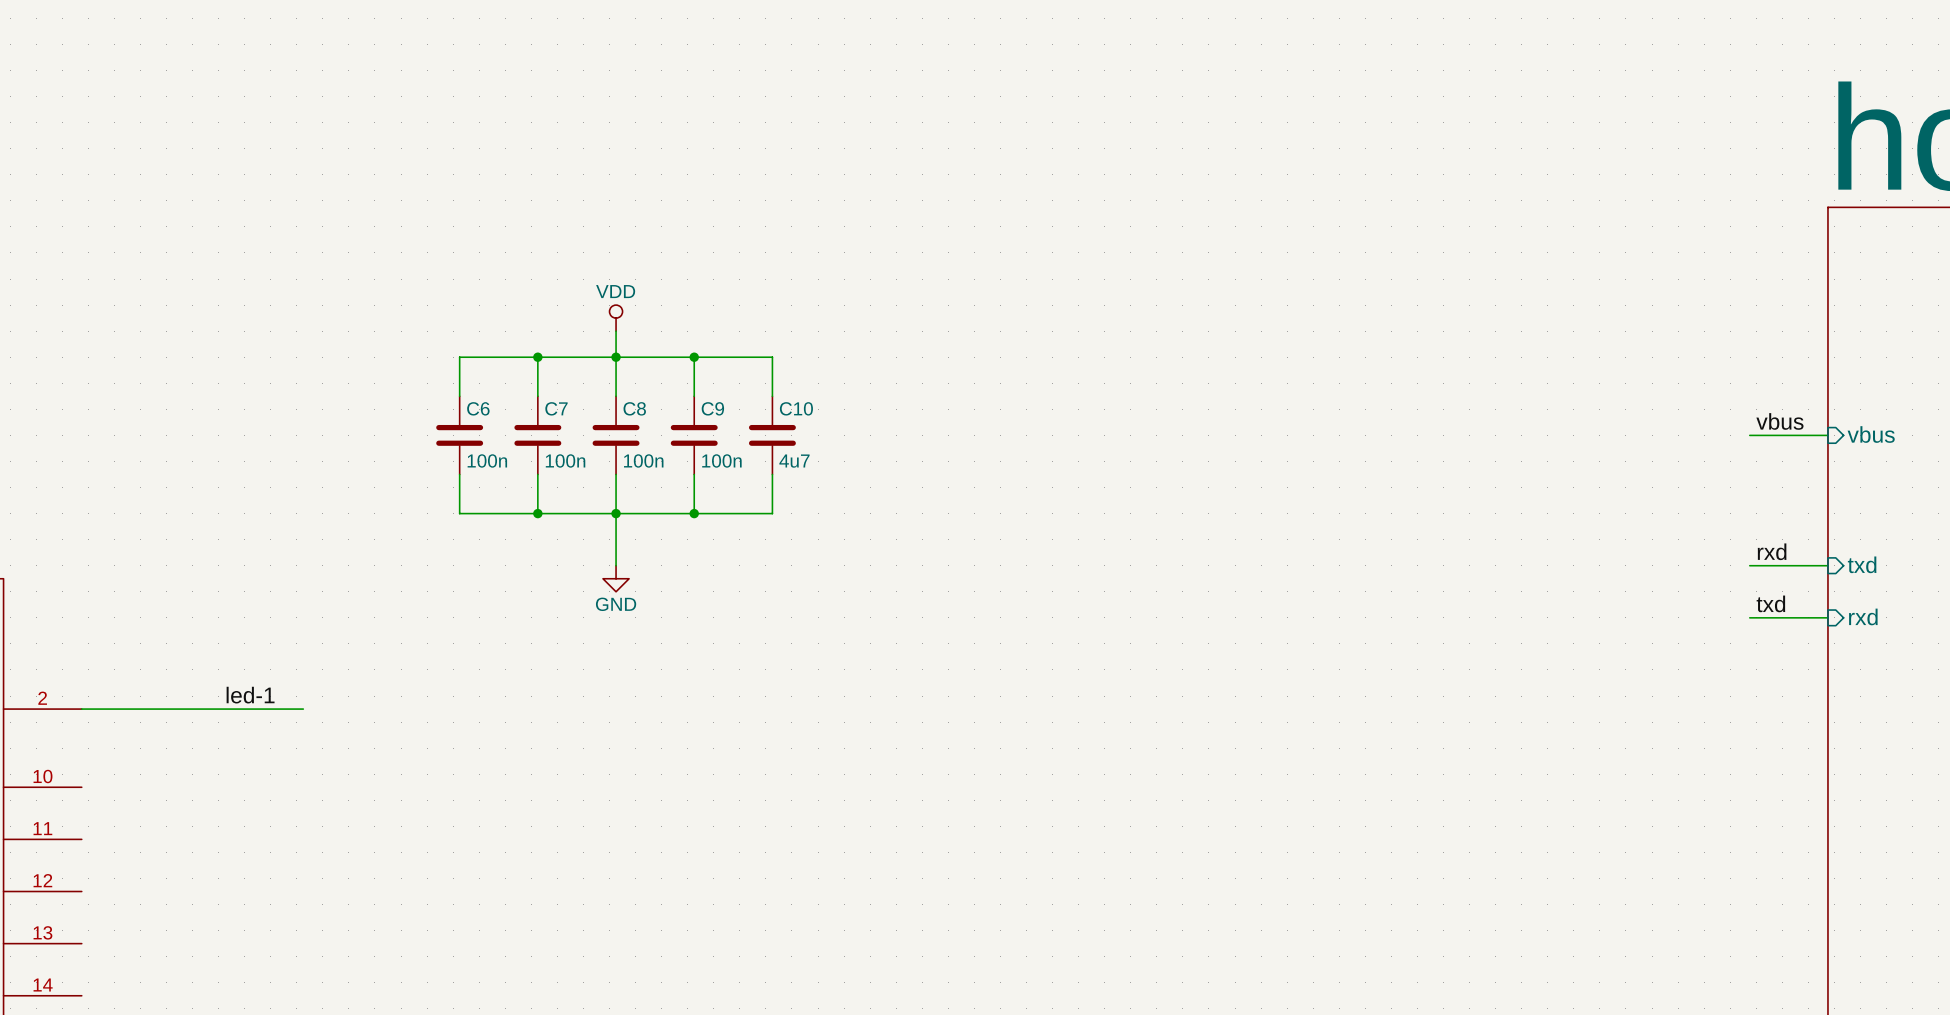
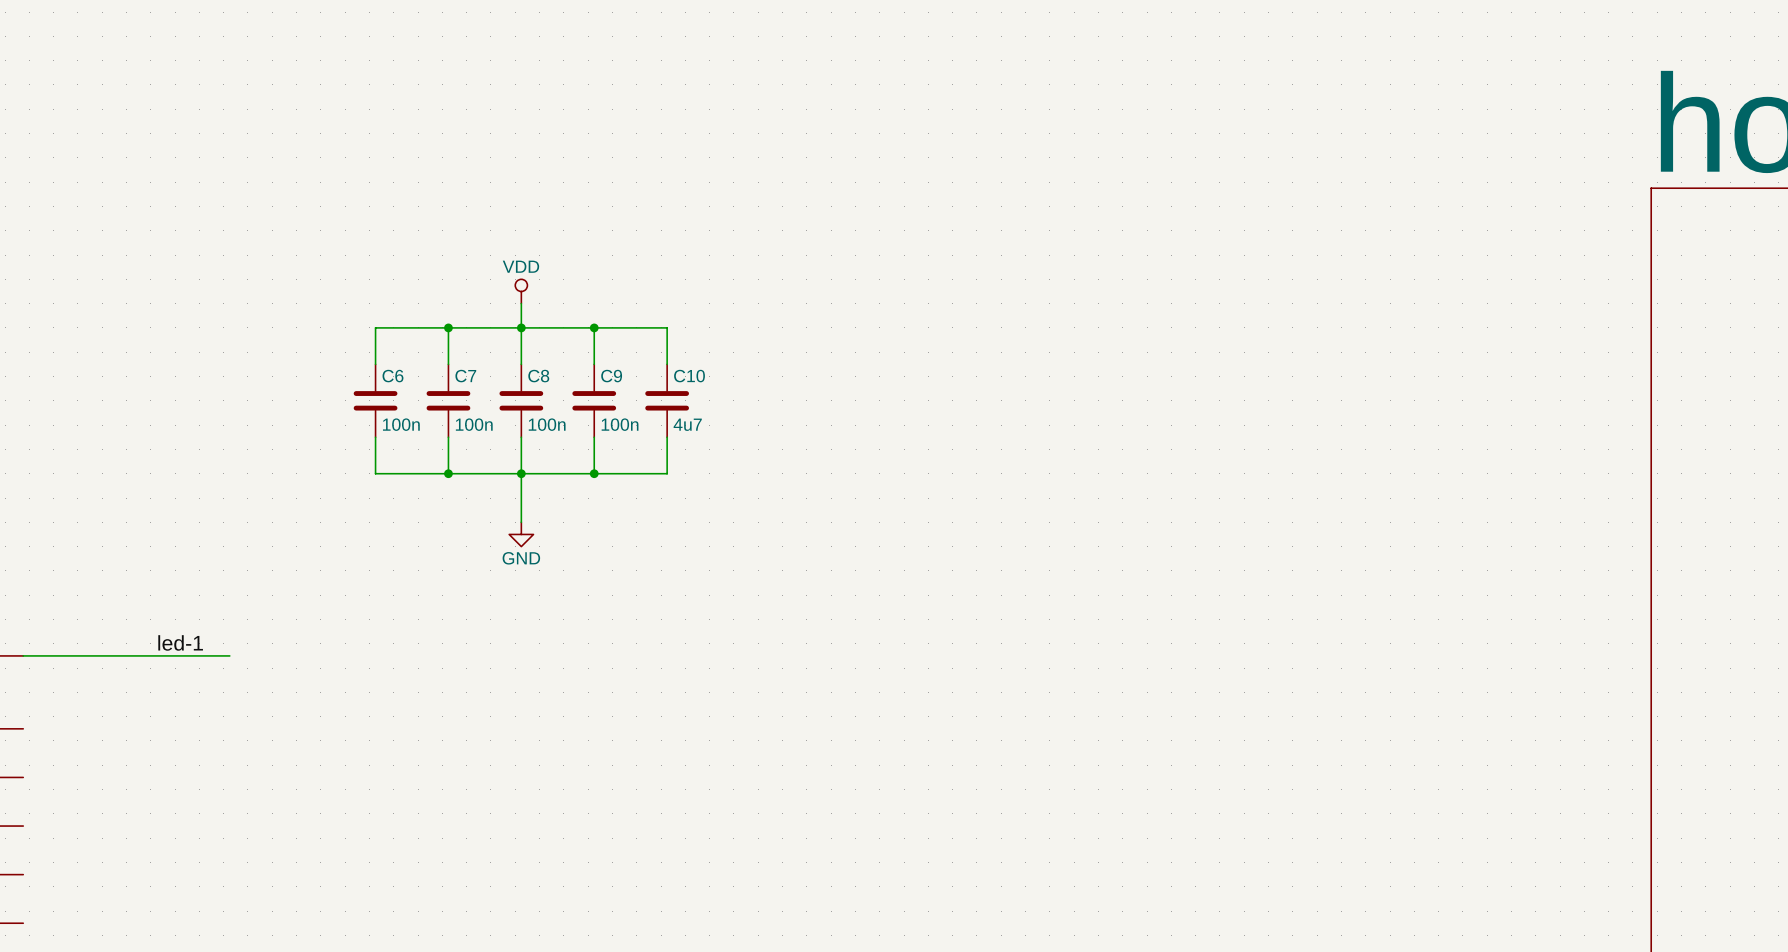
label: vbus (1779, 421) -> none
sheet pin: vbus (1871, 434) -> none
wire: (1749, 435) (1827, 435) -> none
label: rxd (1772, 551) -> none
sheet pin: txd (1862, 564) -> none
wire: (1749, 565) (1827, 565) -> none
label: txd (1770, 603) -> none
sheet pin: rxd (1863, 616) -> none
wire: (1749, 617) (1827, 617) -> none

